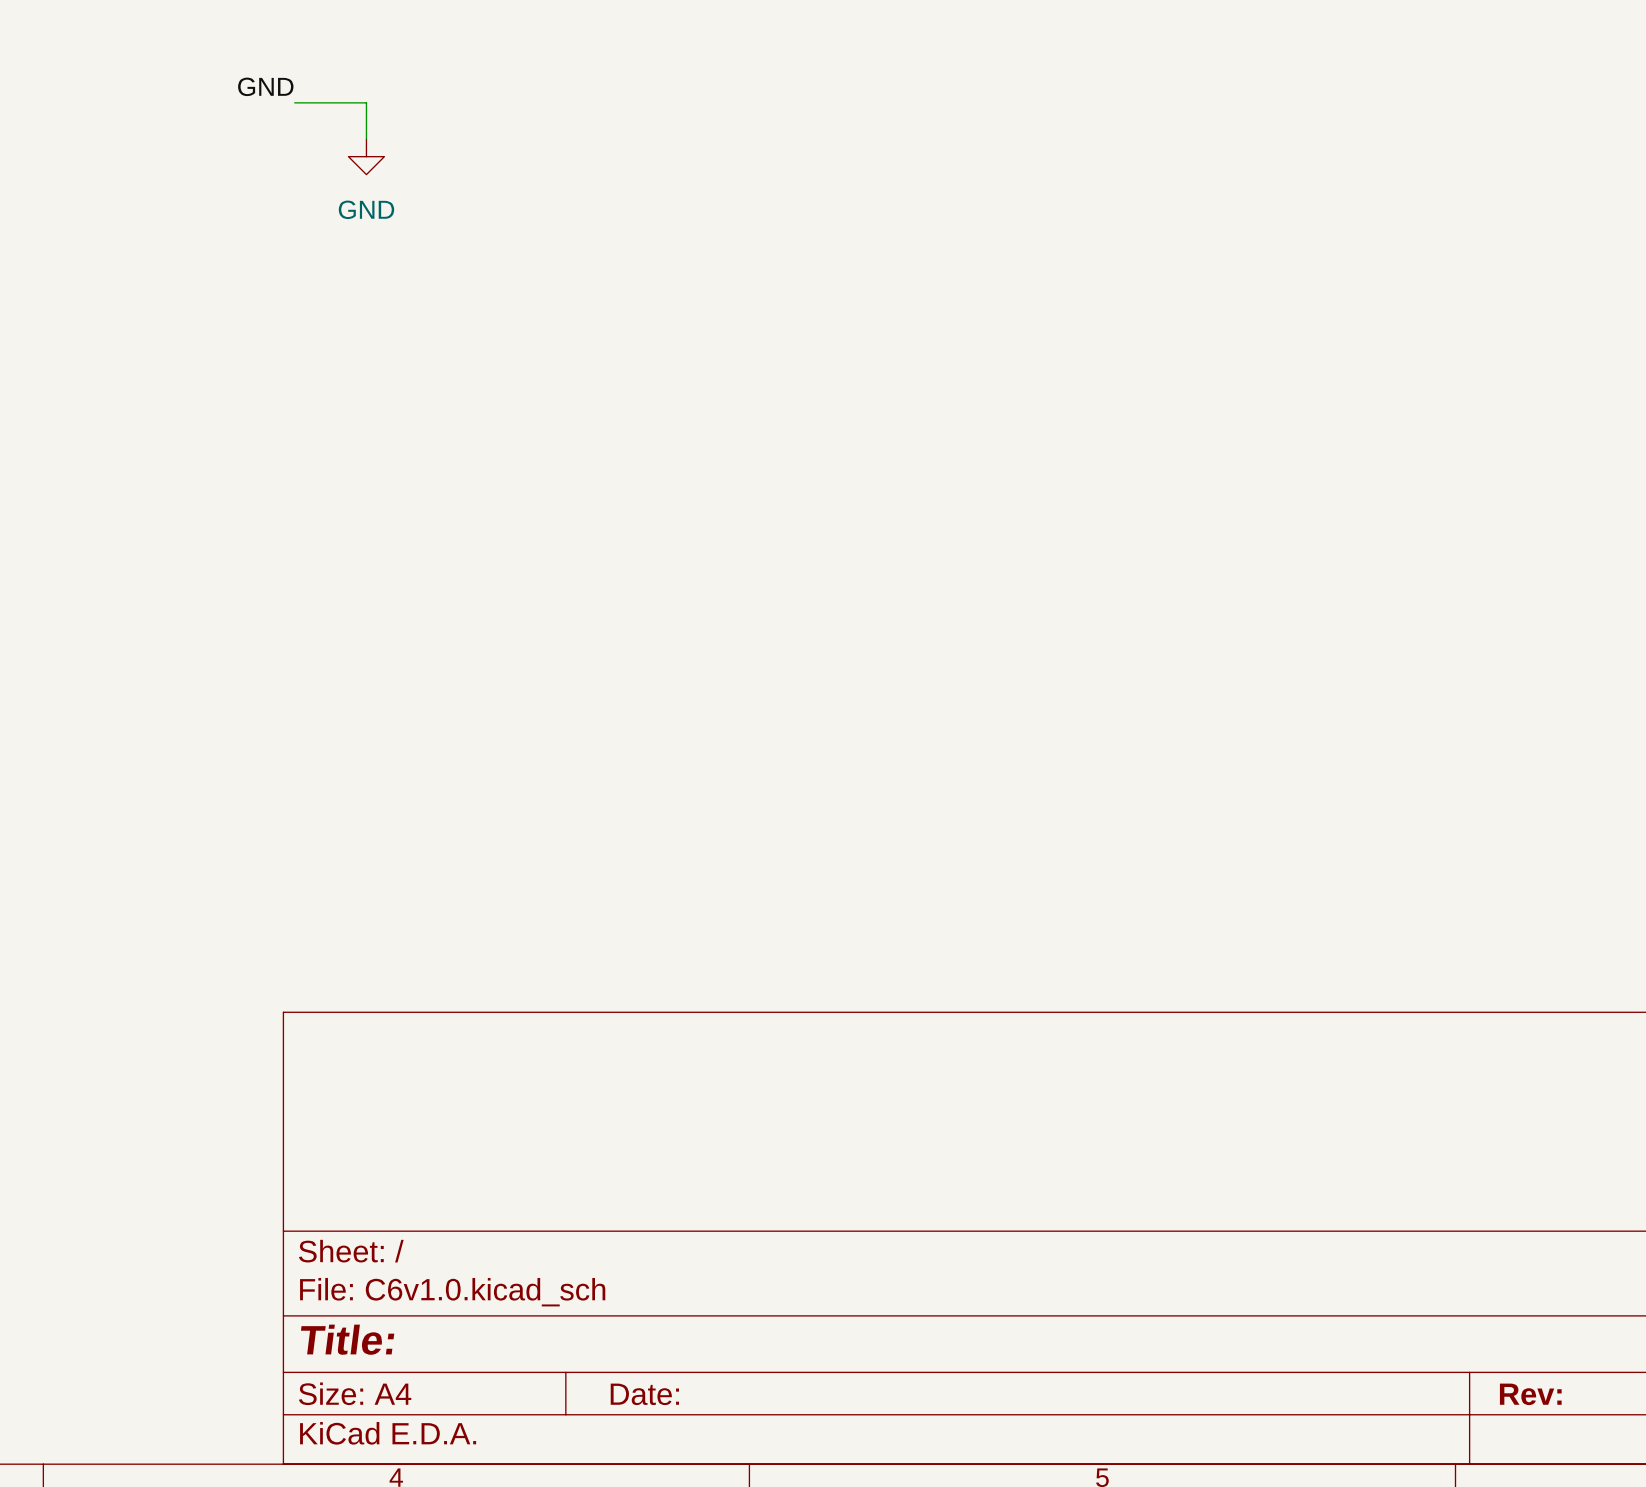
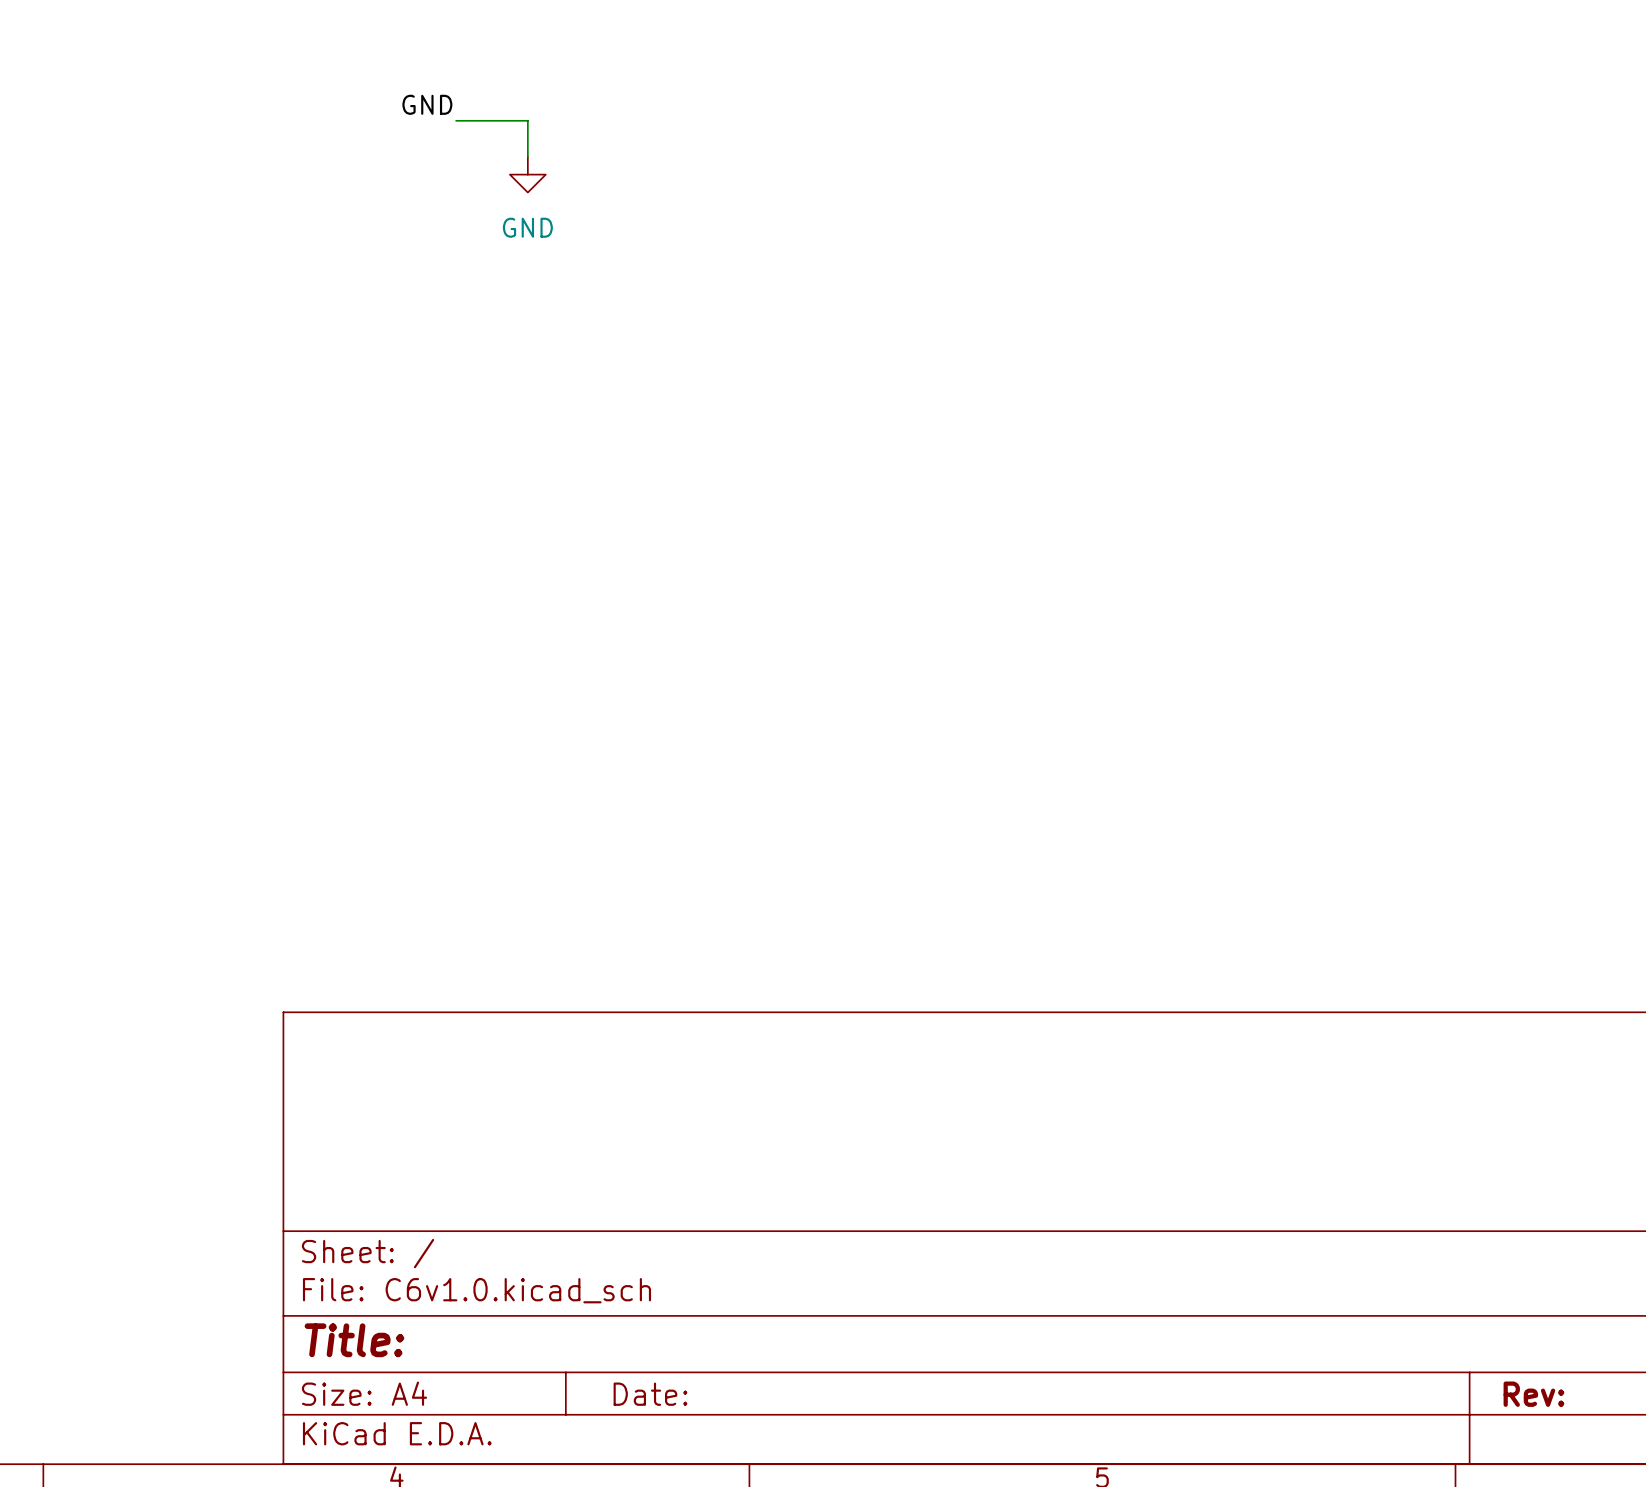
label position: GND (265, 86) -> GND (427, 104)
wire: (294, 102) (366, 102) (366, 138) -> (456, 120) (527, 120) (527, 156)
power symbol position: GND (366, 156) -> GND (527, 174)

